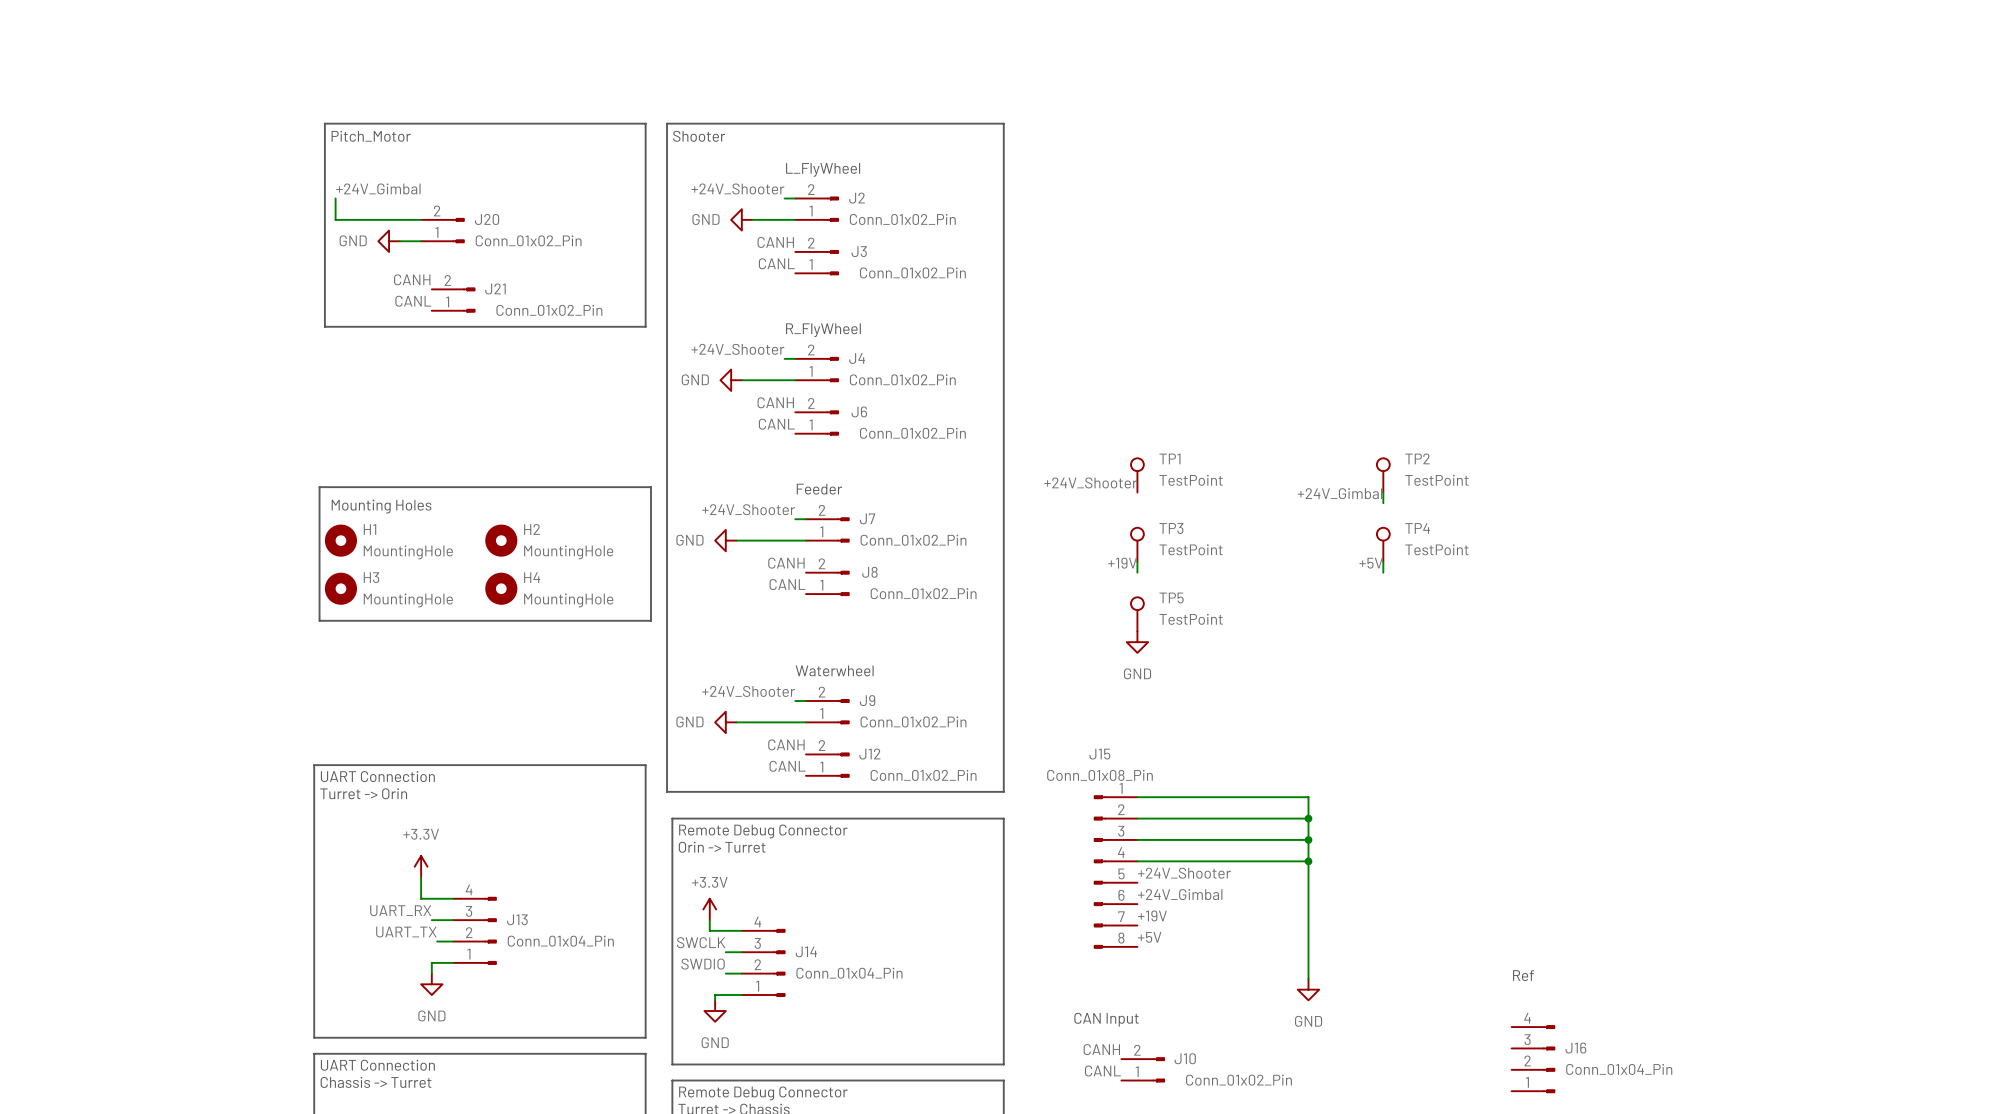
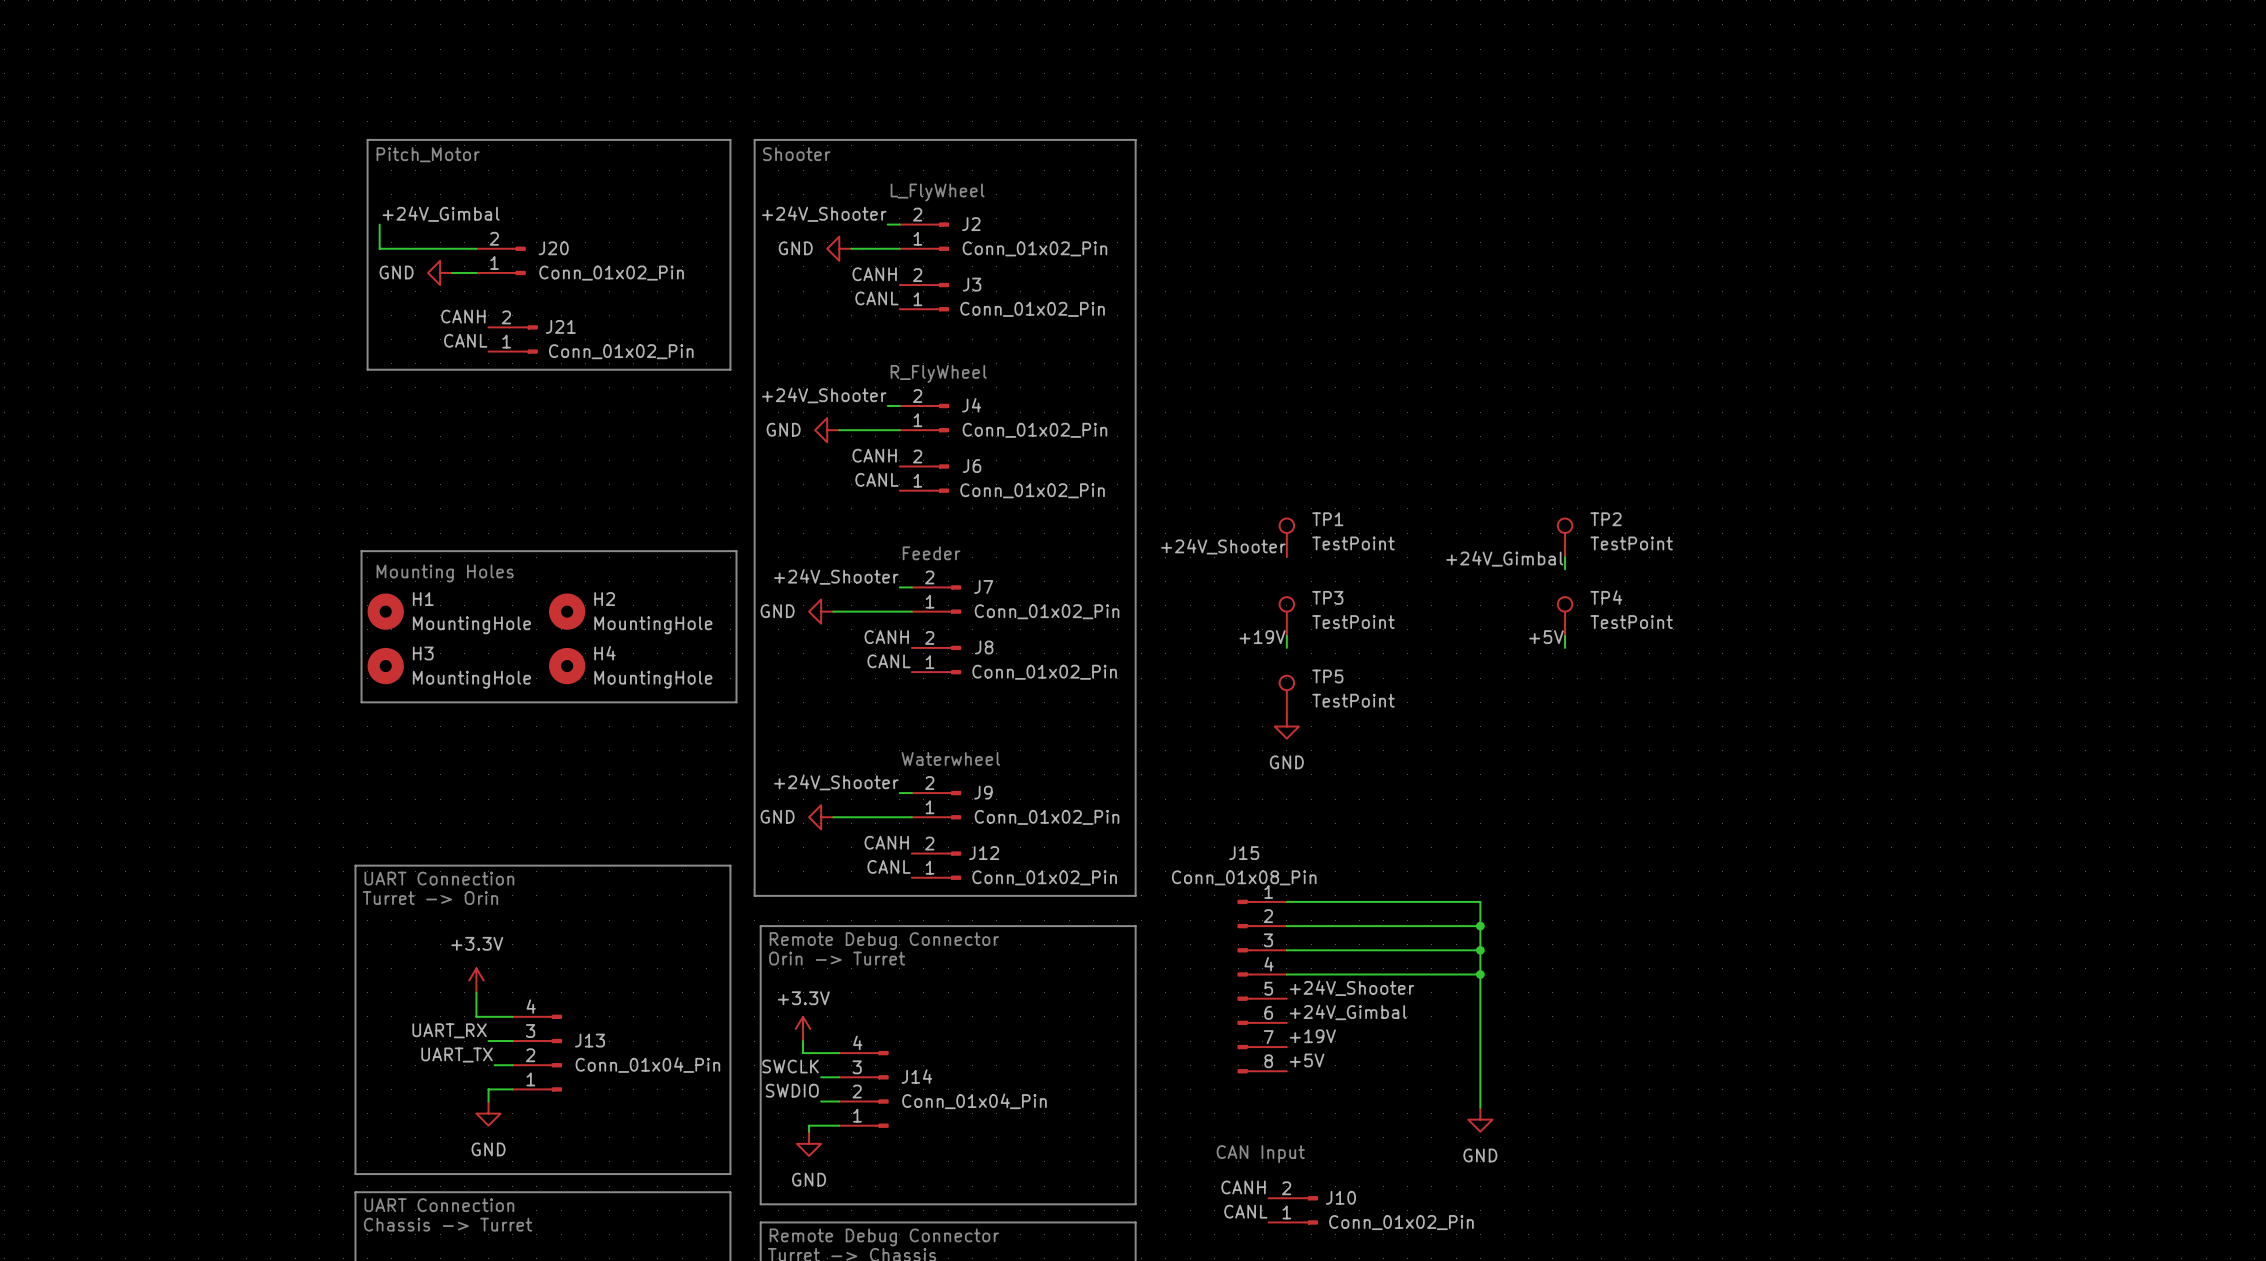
text: Ref (1523, 975) -> none
J16: Conn_01x04_Pin (1533, 1059) -> none

